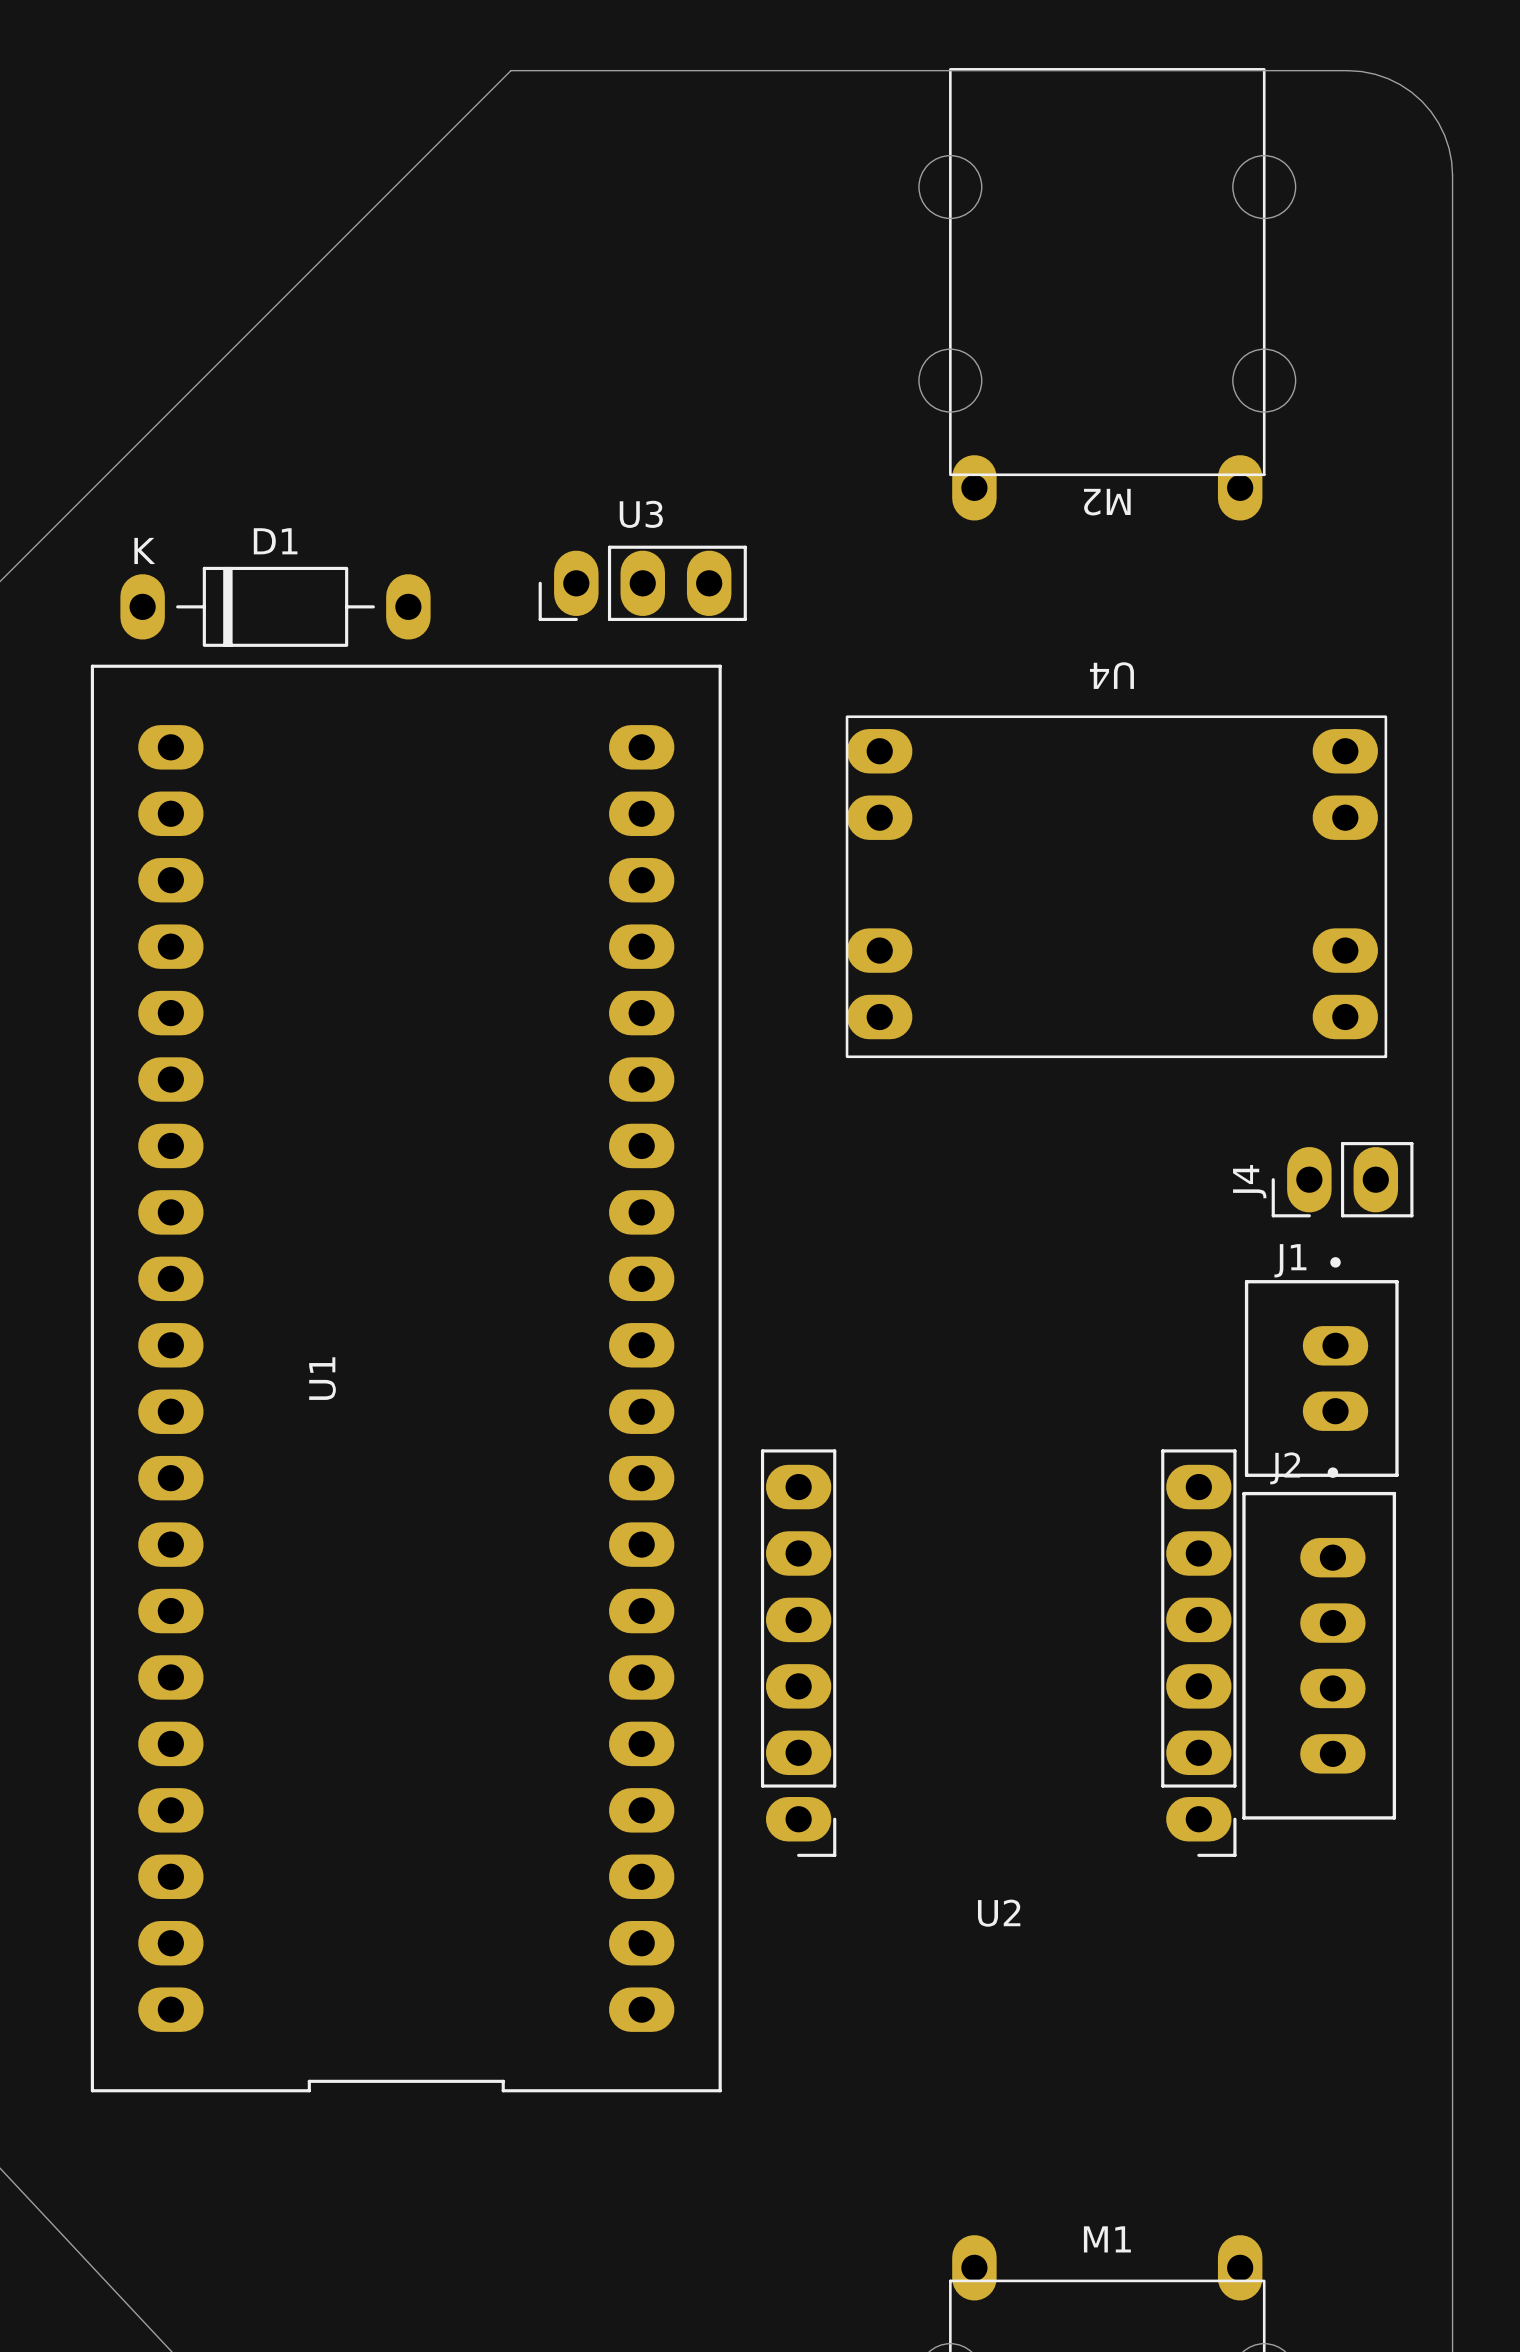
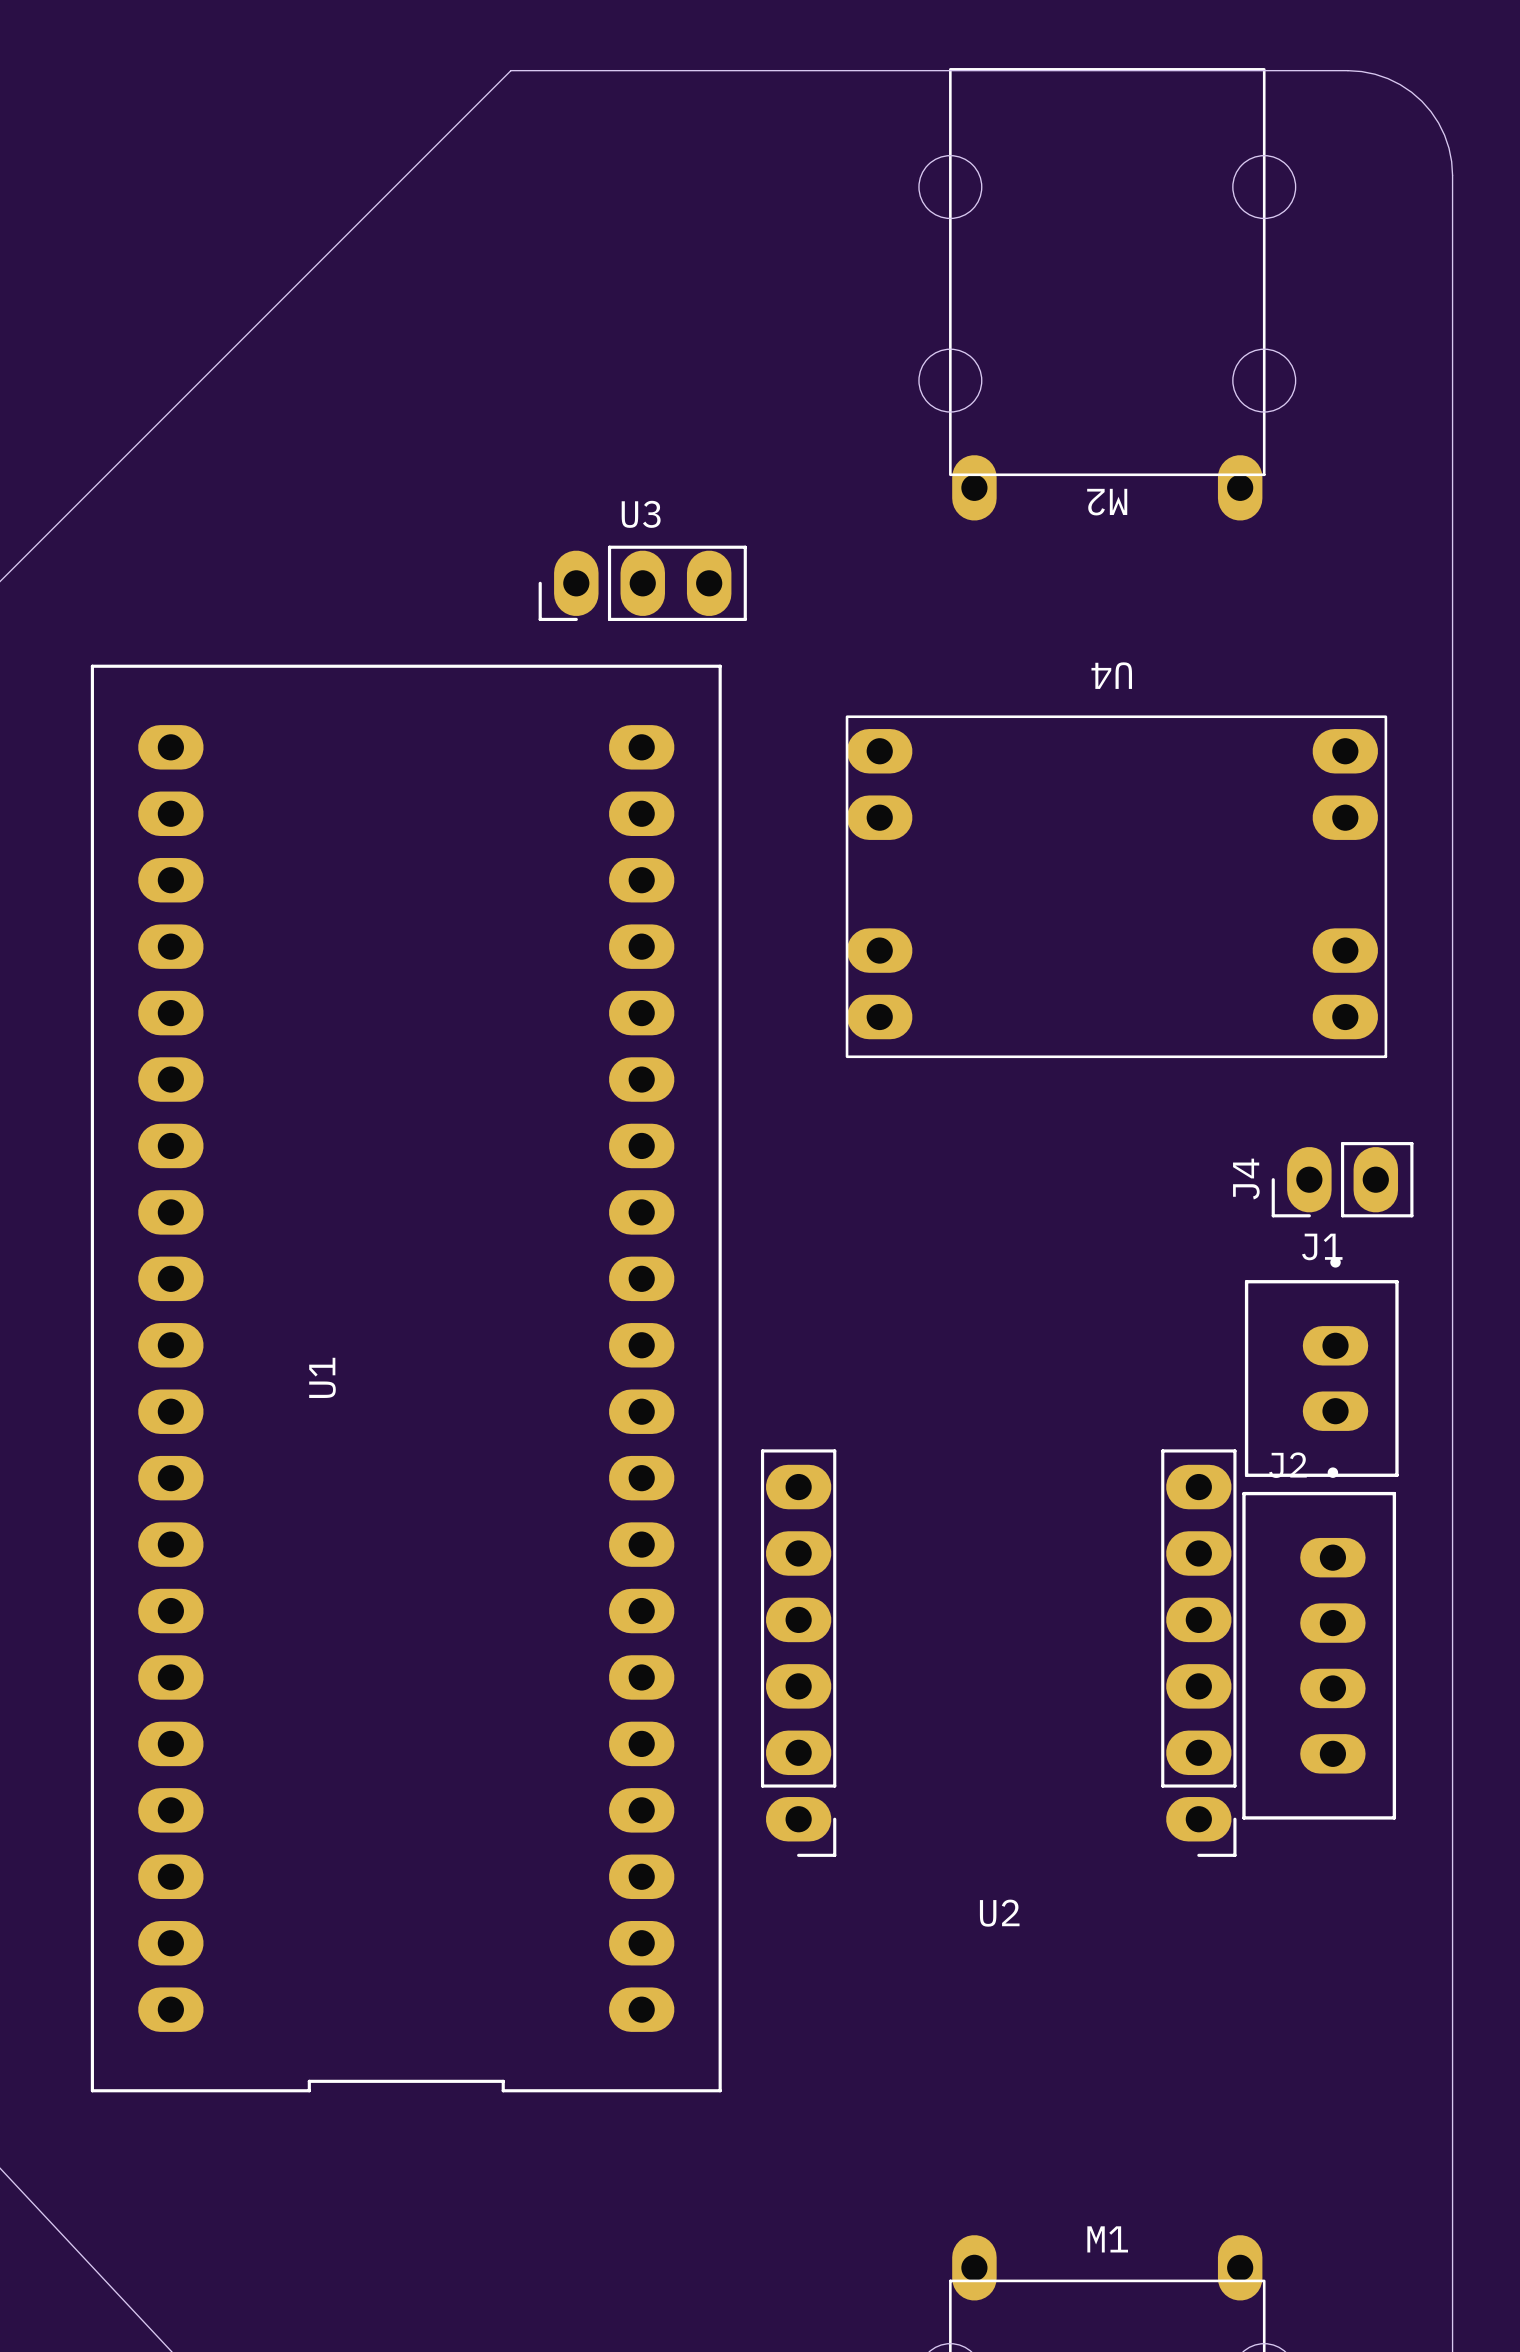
D1: (275, 606) -> none
J1 name position: J1 (1290, 1260) -> J1 (1322, 1246)

